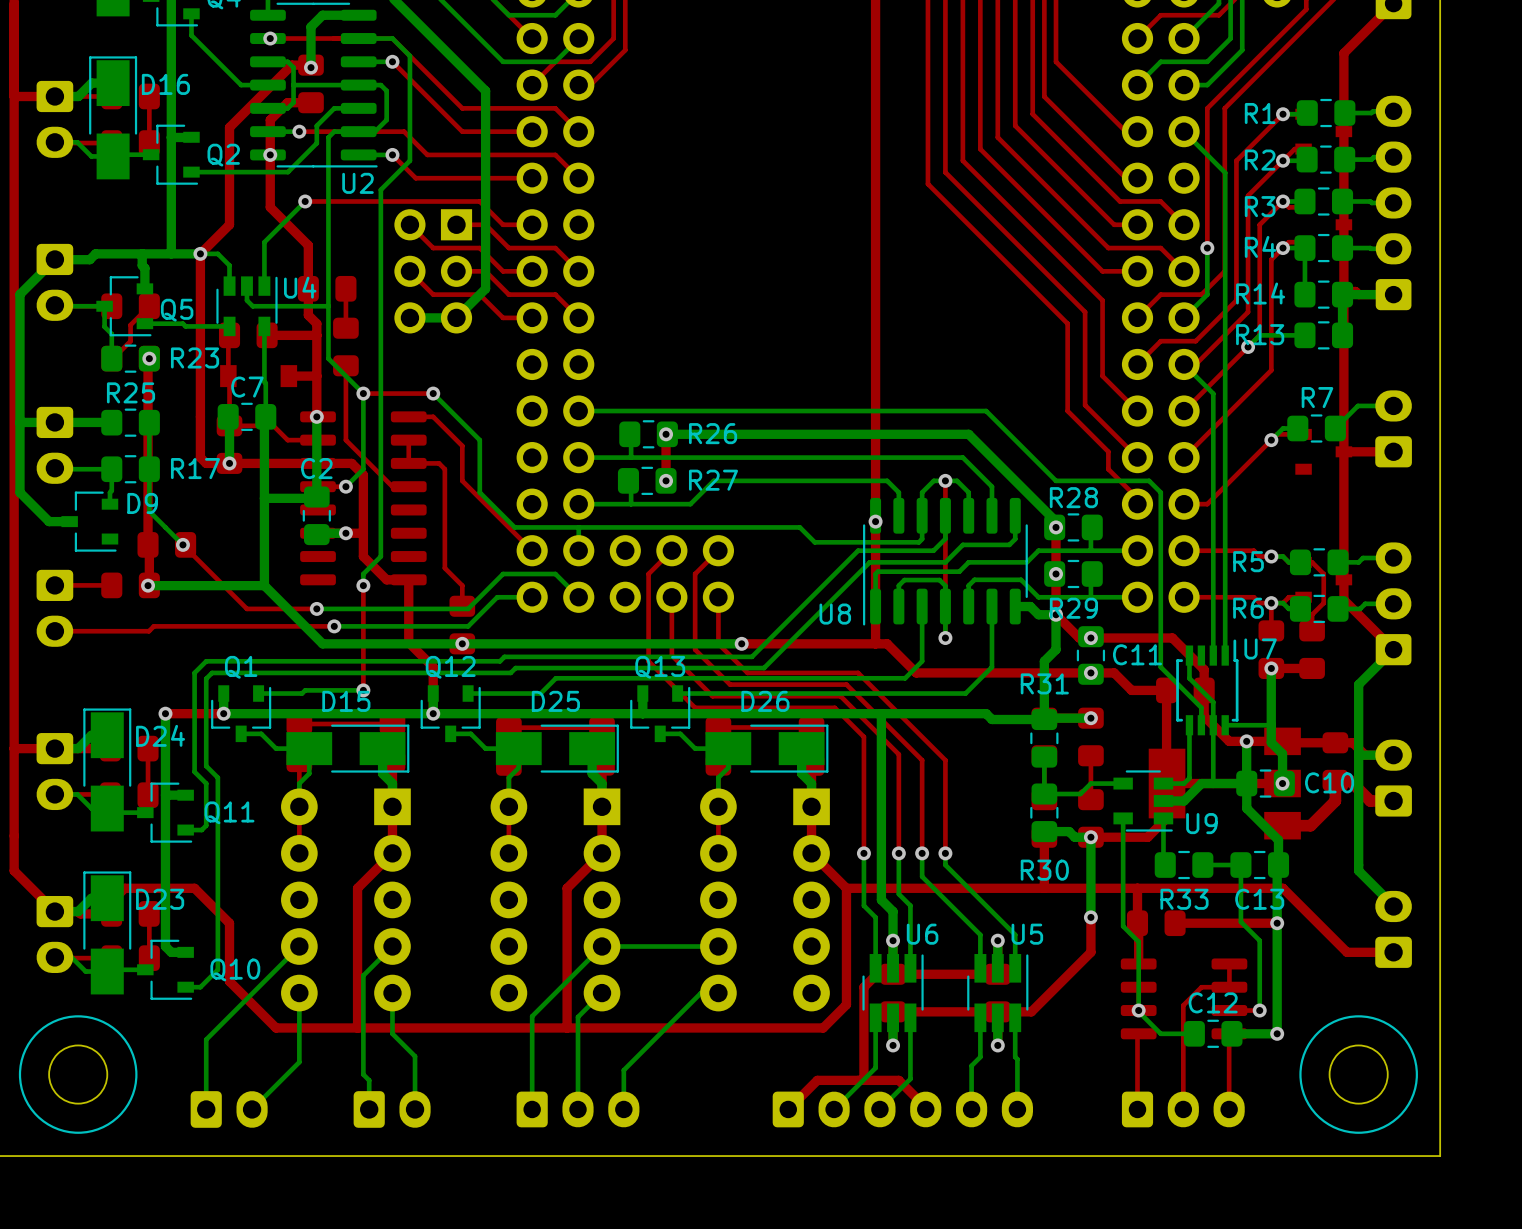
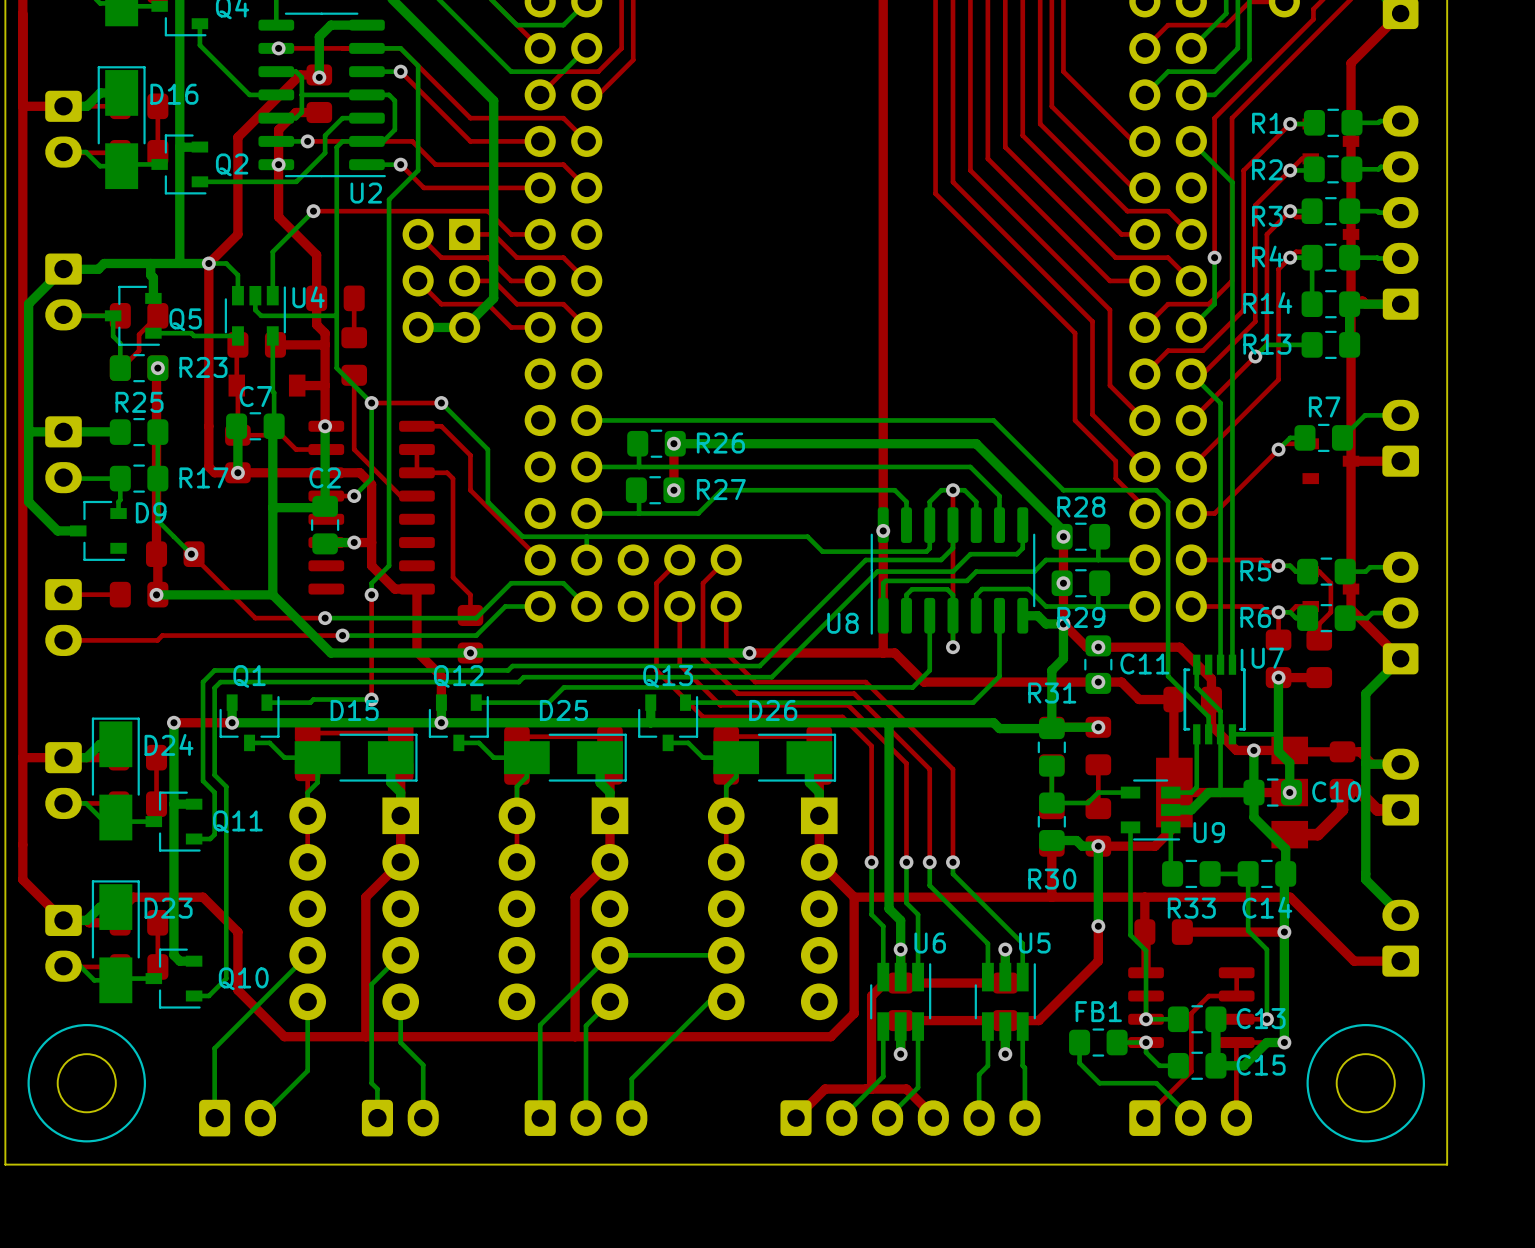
C13 name: C13 (1259, 899) -> C14 (1267, 907)
top track: (1184, 1004) (1183, 1109) -> (1191, 1013) (1191, 1071) (1144, 1118)
bottom track: (1138, 1010) (1160, 1033) (1194, 1033) -> (1146, 1019) (1178, 1019)
C13: none -> (1197, 1019)
bottom track: none -> (1079, 1042) (1079, 1063) (1099, 1083) (1156, 1083) (1190, 1118)
FB1: none -> (1098, 1042)
bottom track: none -> (1117, 1042) (1146, 1042) (1146, 1052) (1159, 1065) (1178, 1065)
via: none -> (1146, 1042)
C12: (1213, 1033) -> none
bottom track: (1259, 1033) (1231, 1033) -> (1266, 1042) (1243, 1065) (1215, 1065) (1215, 1019)
top track: (1137, 1035) (1137, 1109) -> none
C15: none -> (1197, 1065)

